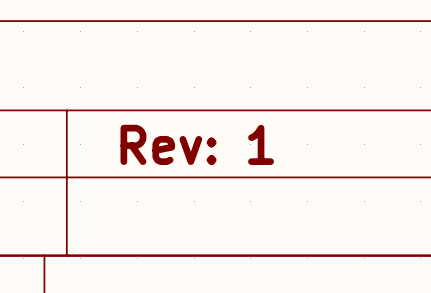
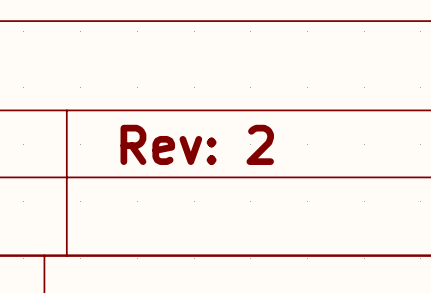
title block: Rev: 1 (197, 144) -> Rev: 2 (197, 144)

